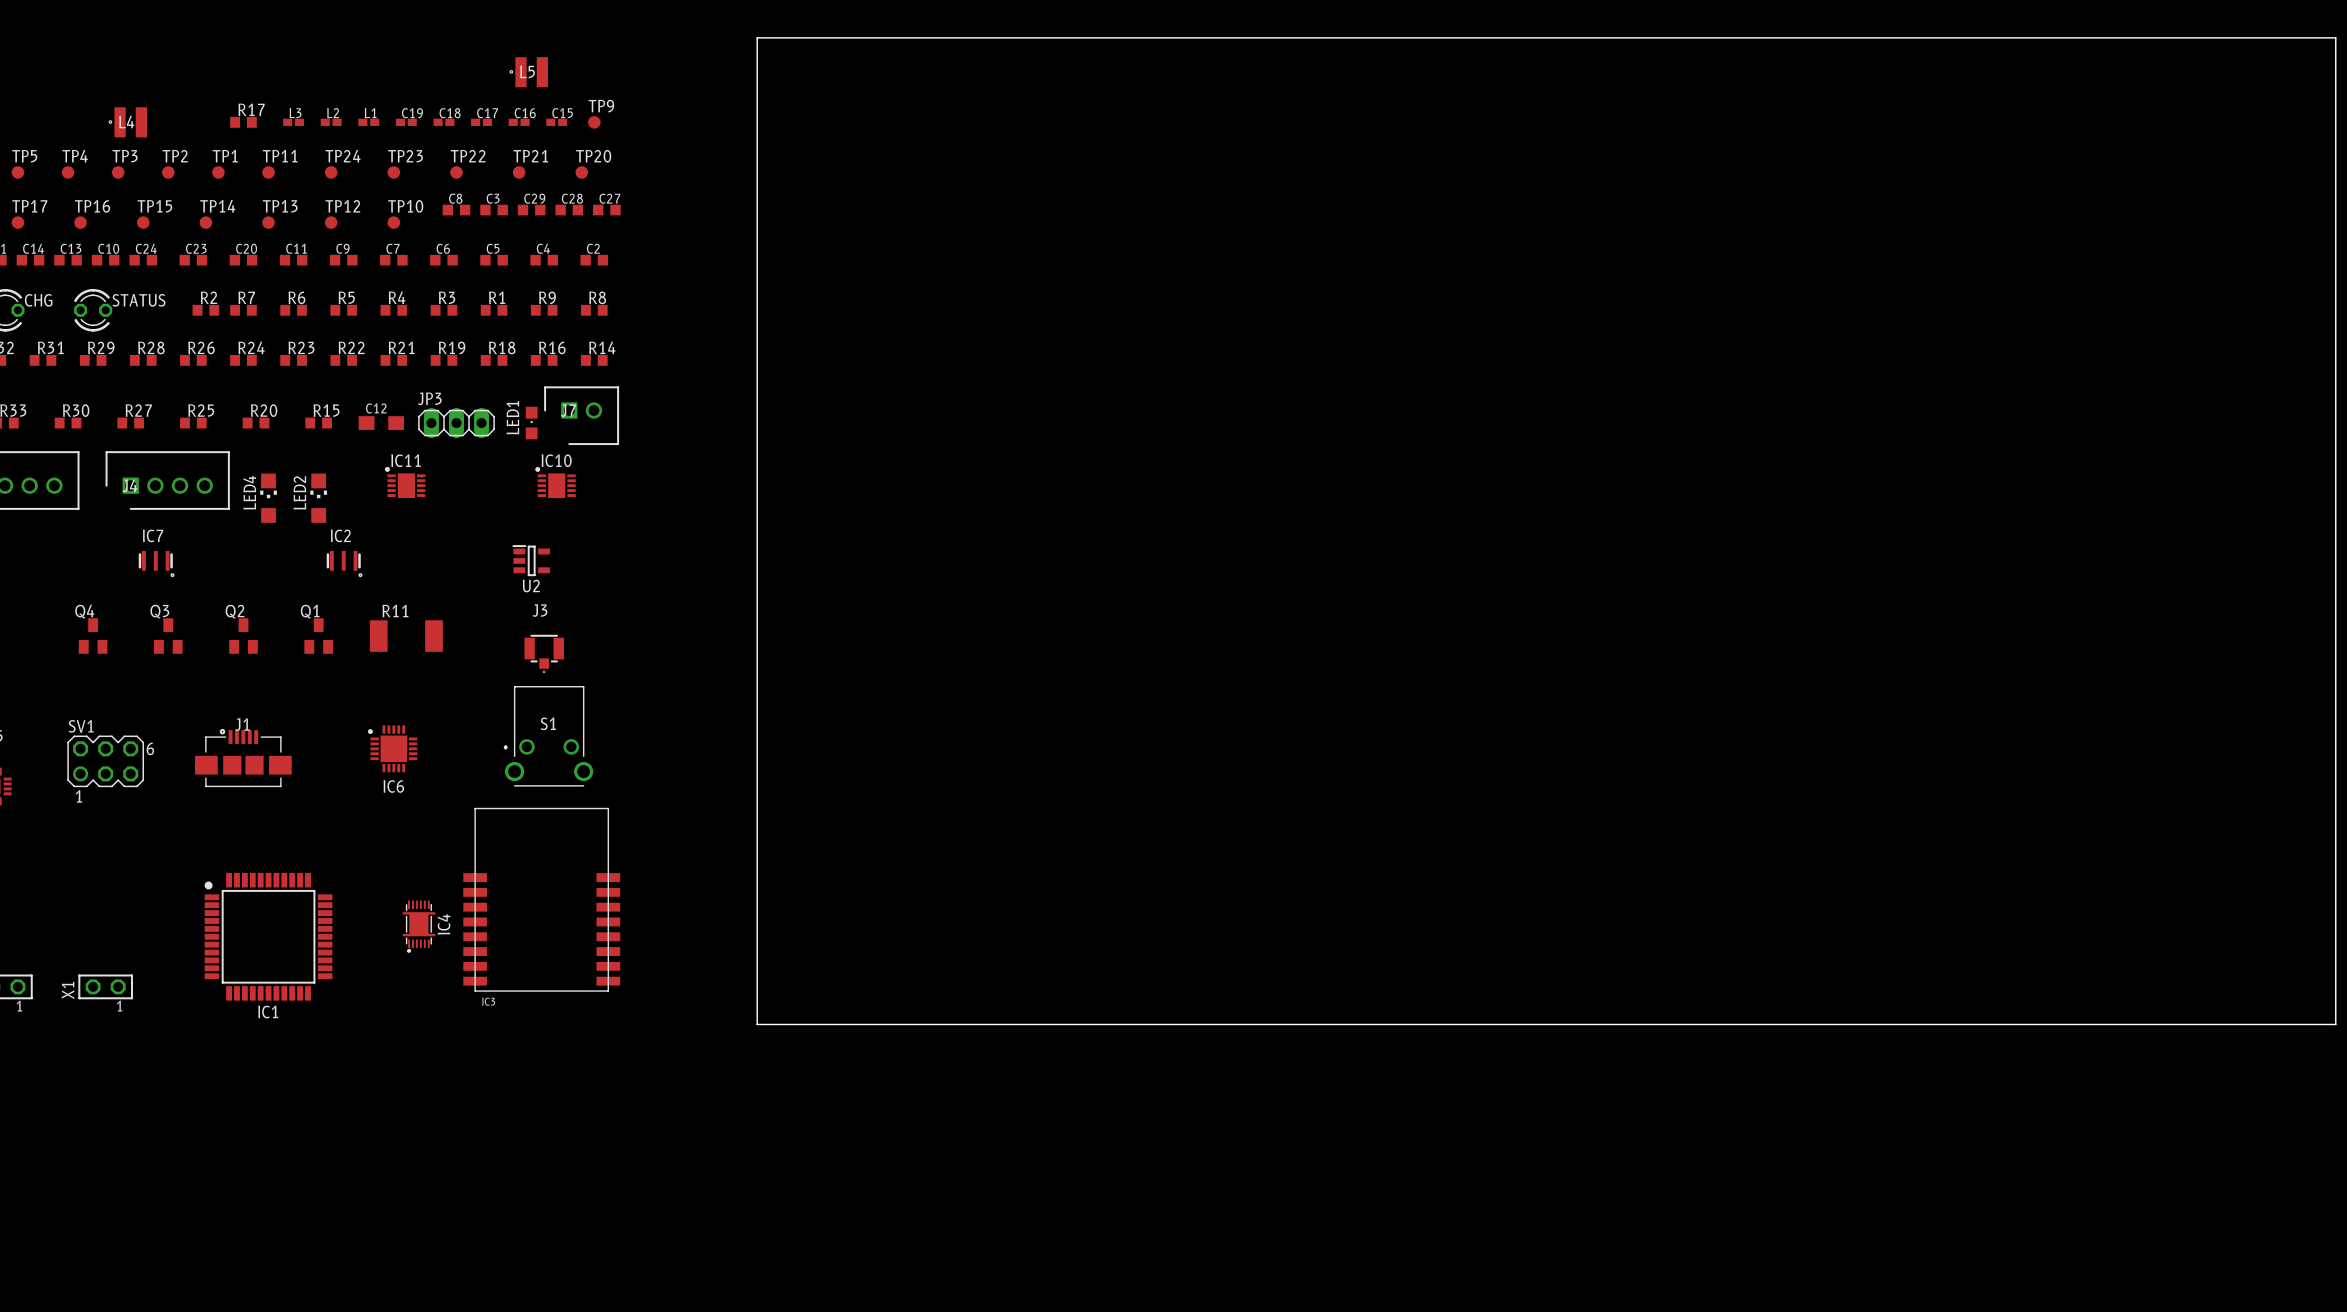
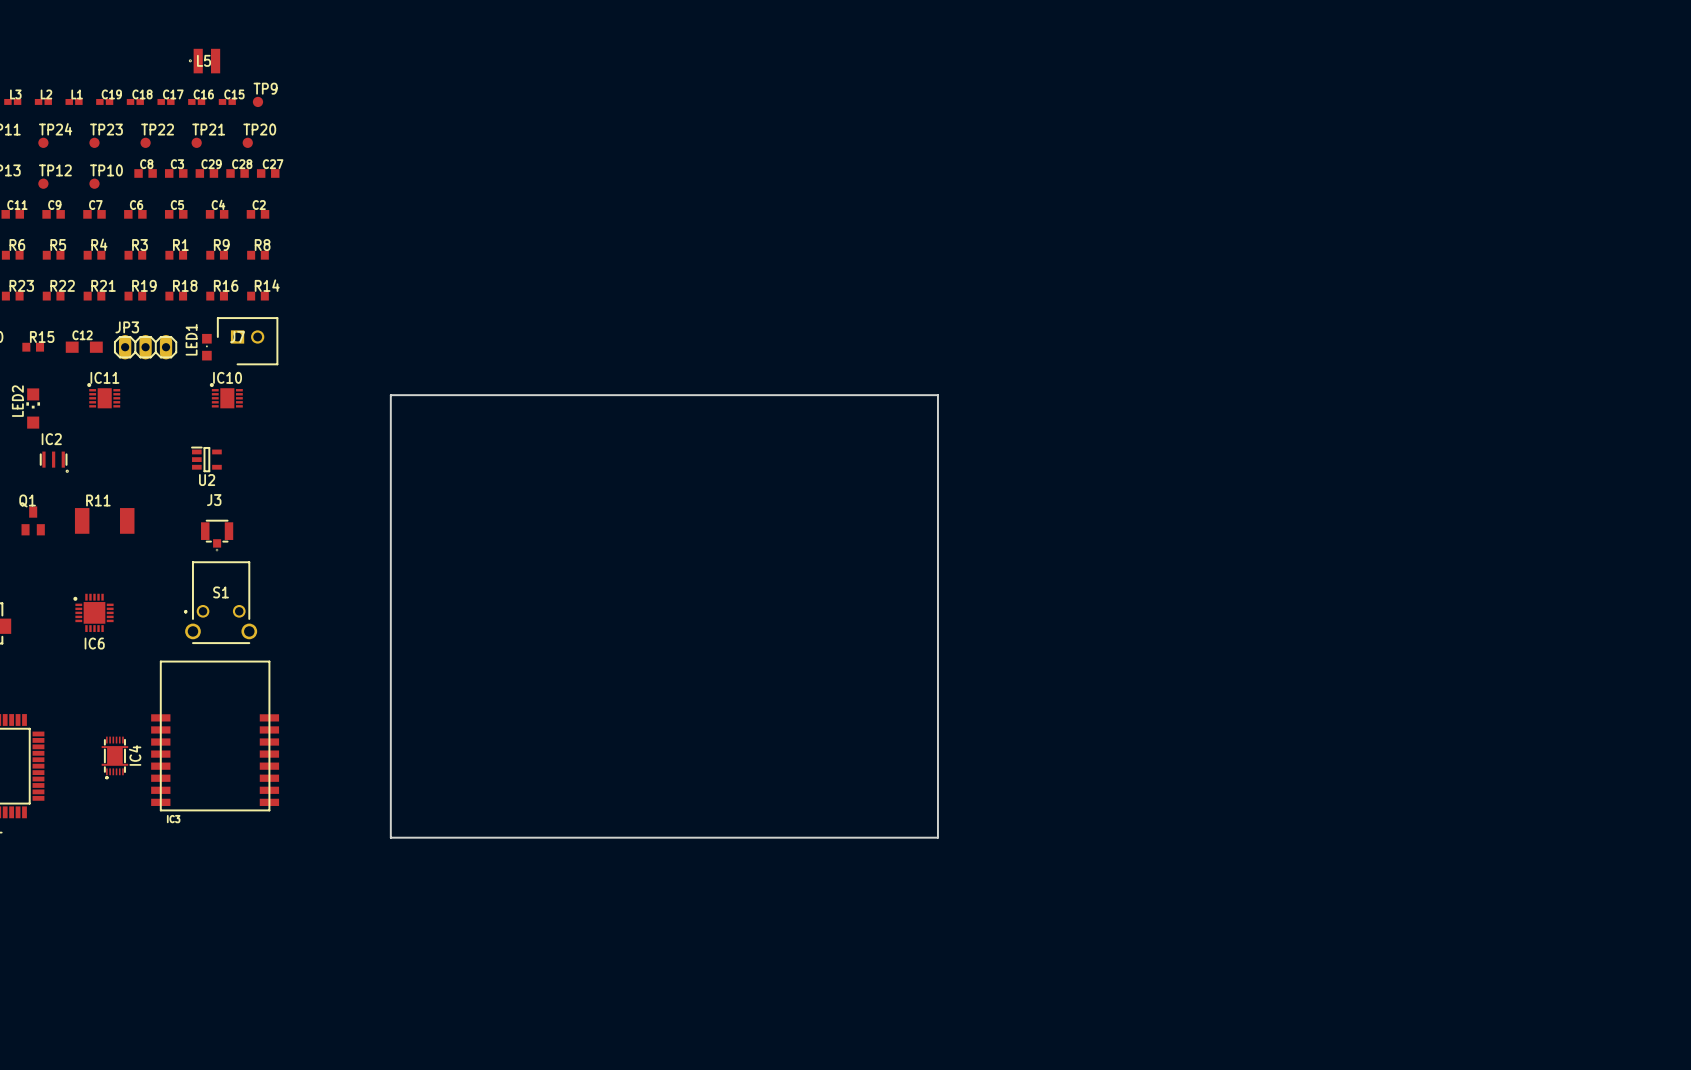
board edge: (757, 481) (757, 37) (2335, 37) (2335, 1024) (1428, 1024) -> (390, 395) (937, 395) (937, 837)

